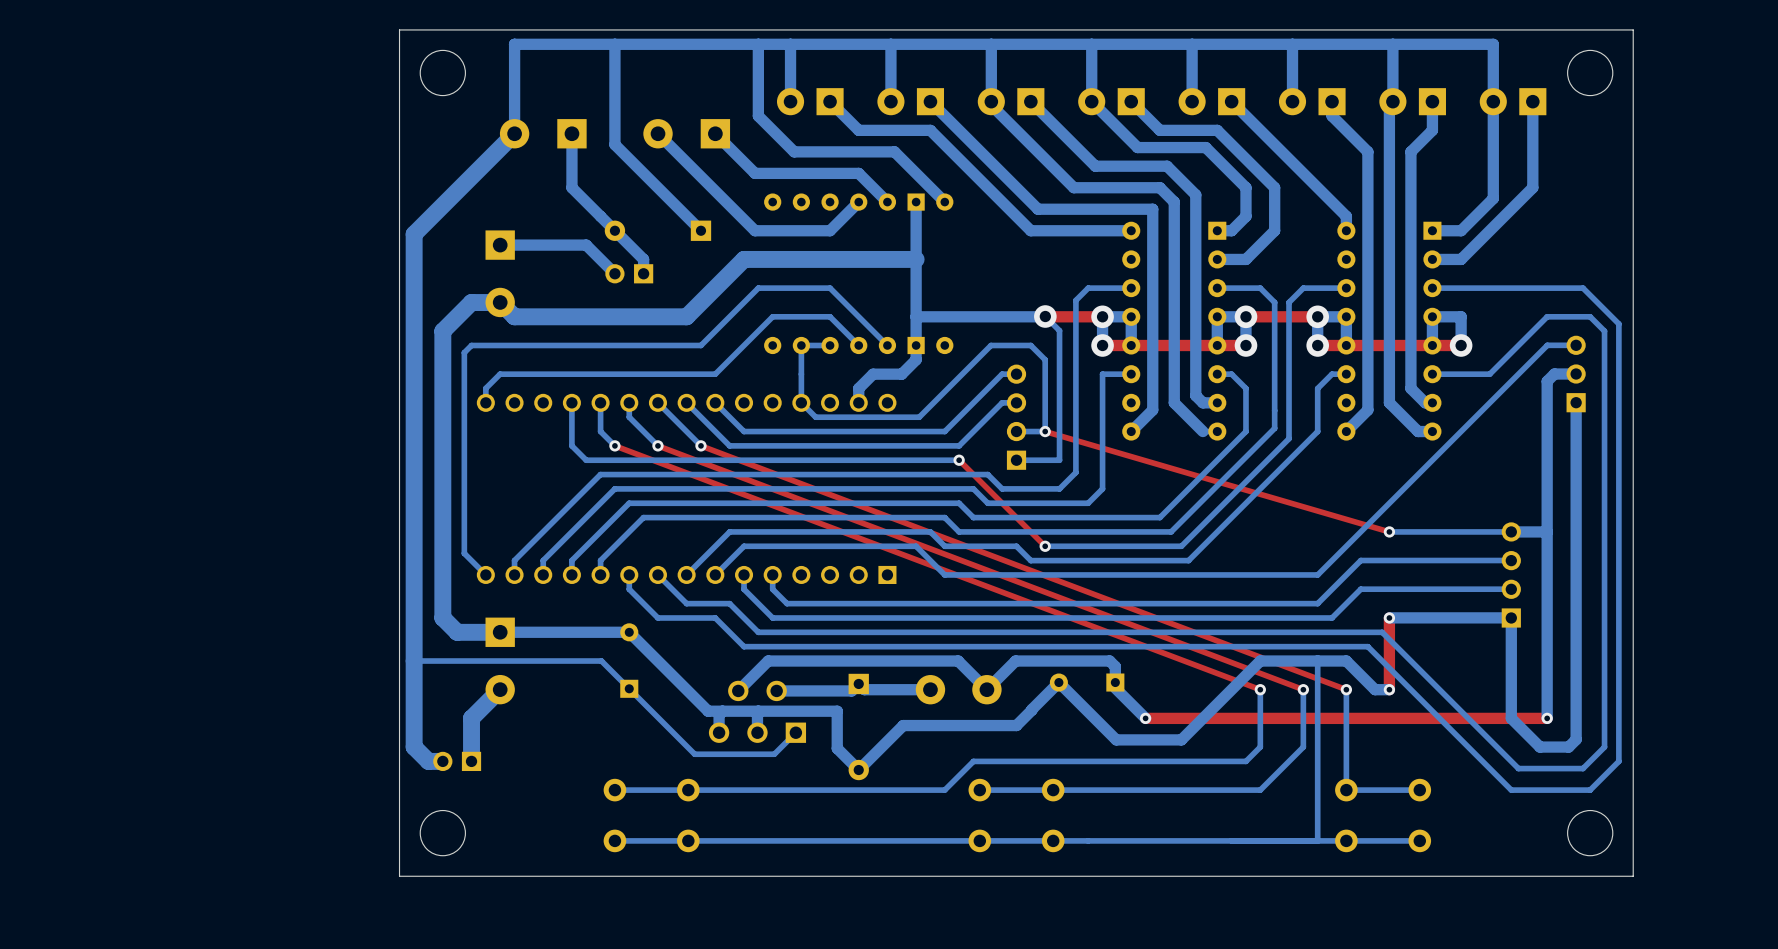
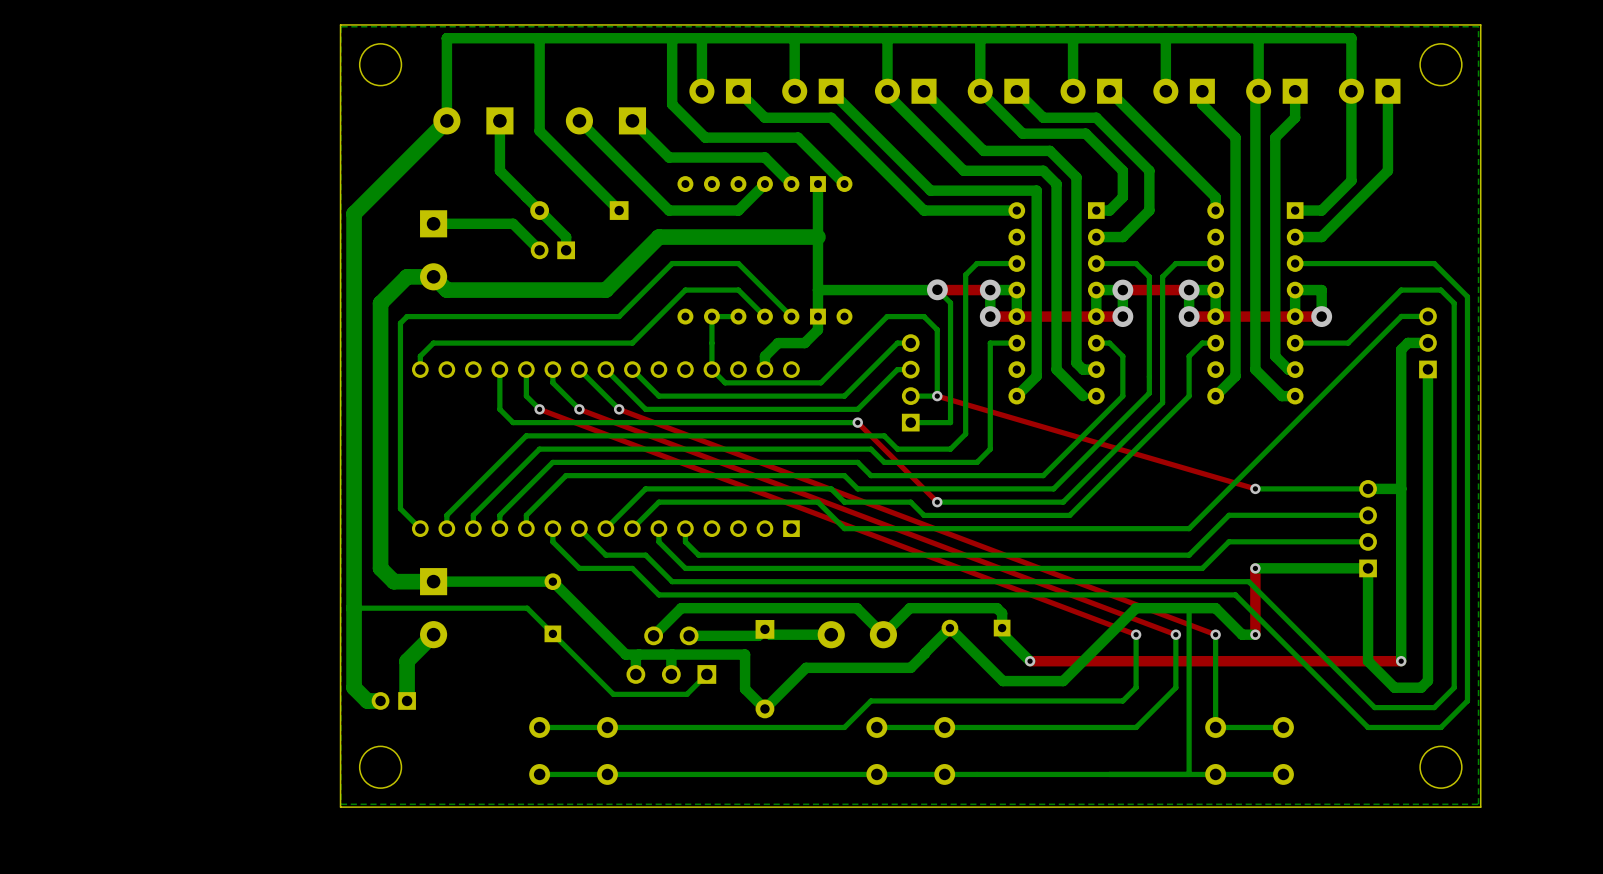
bottom zone outline: none -> (1478, 26) (340, 26) (340, 804) (1478, 804) (1478, 26)

